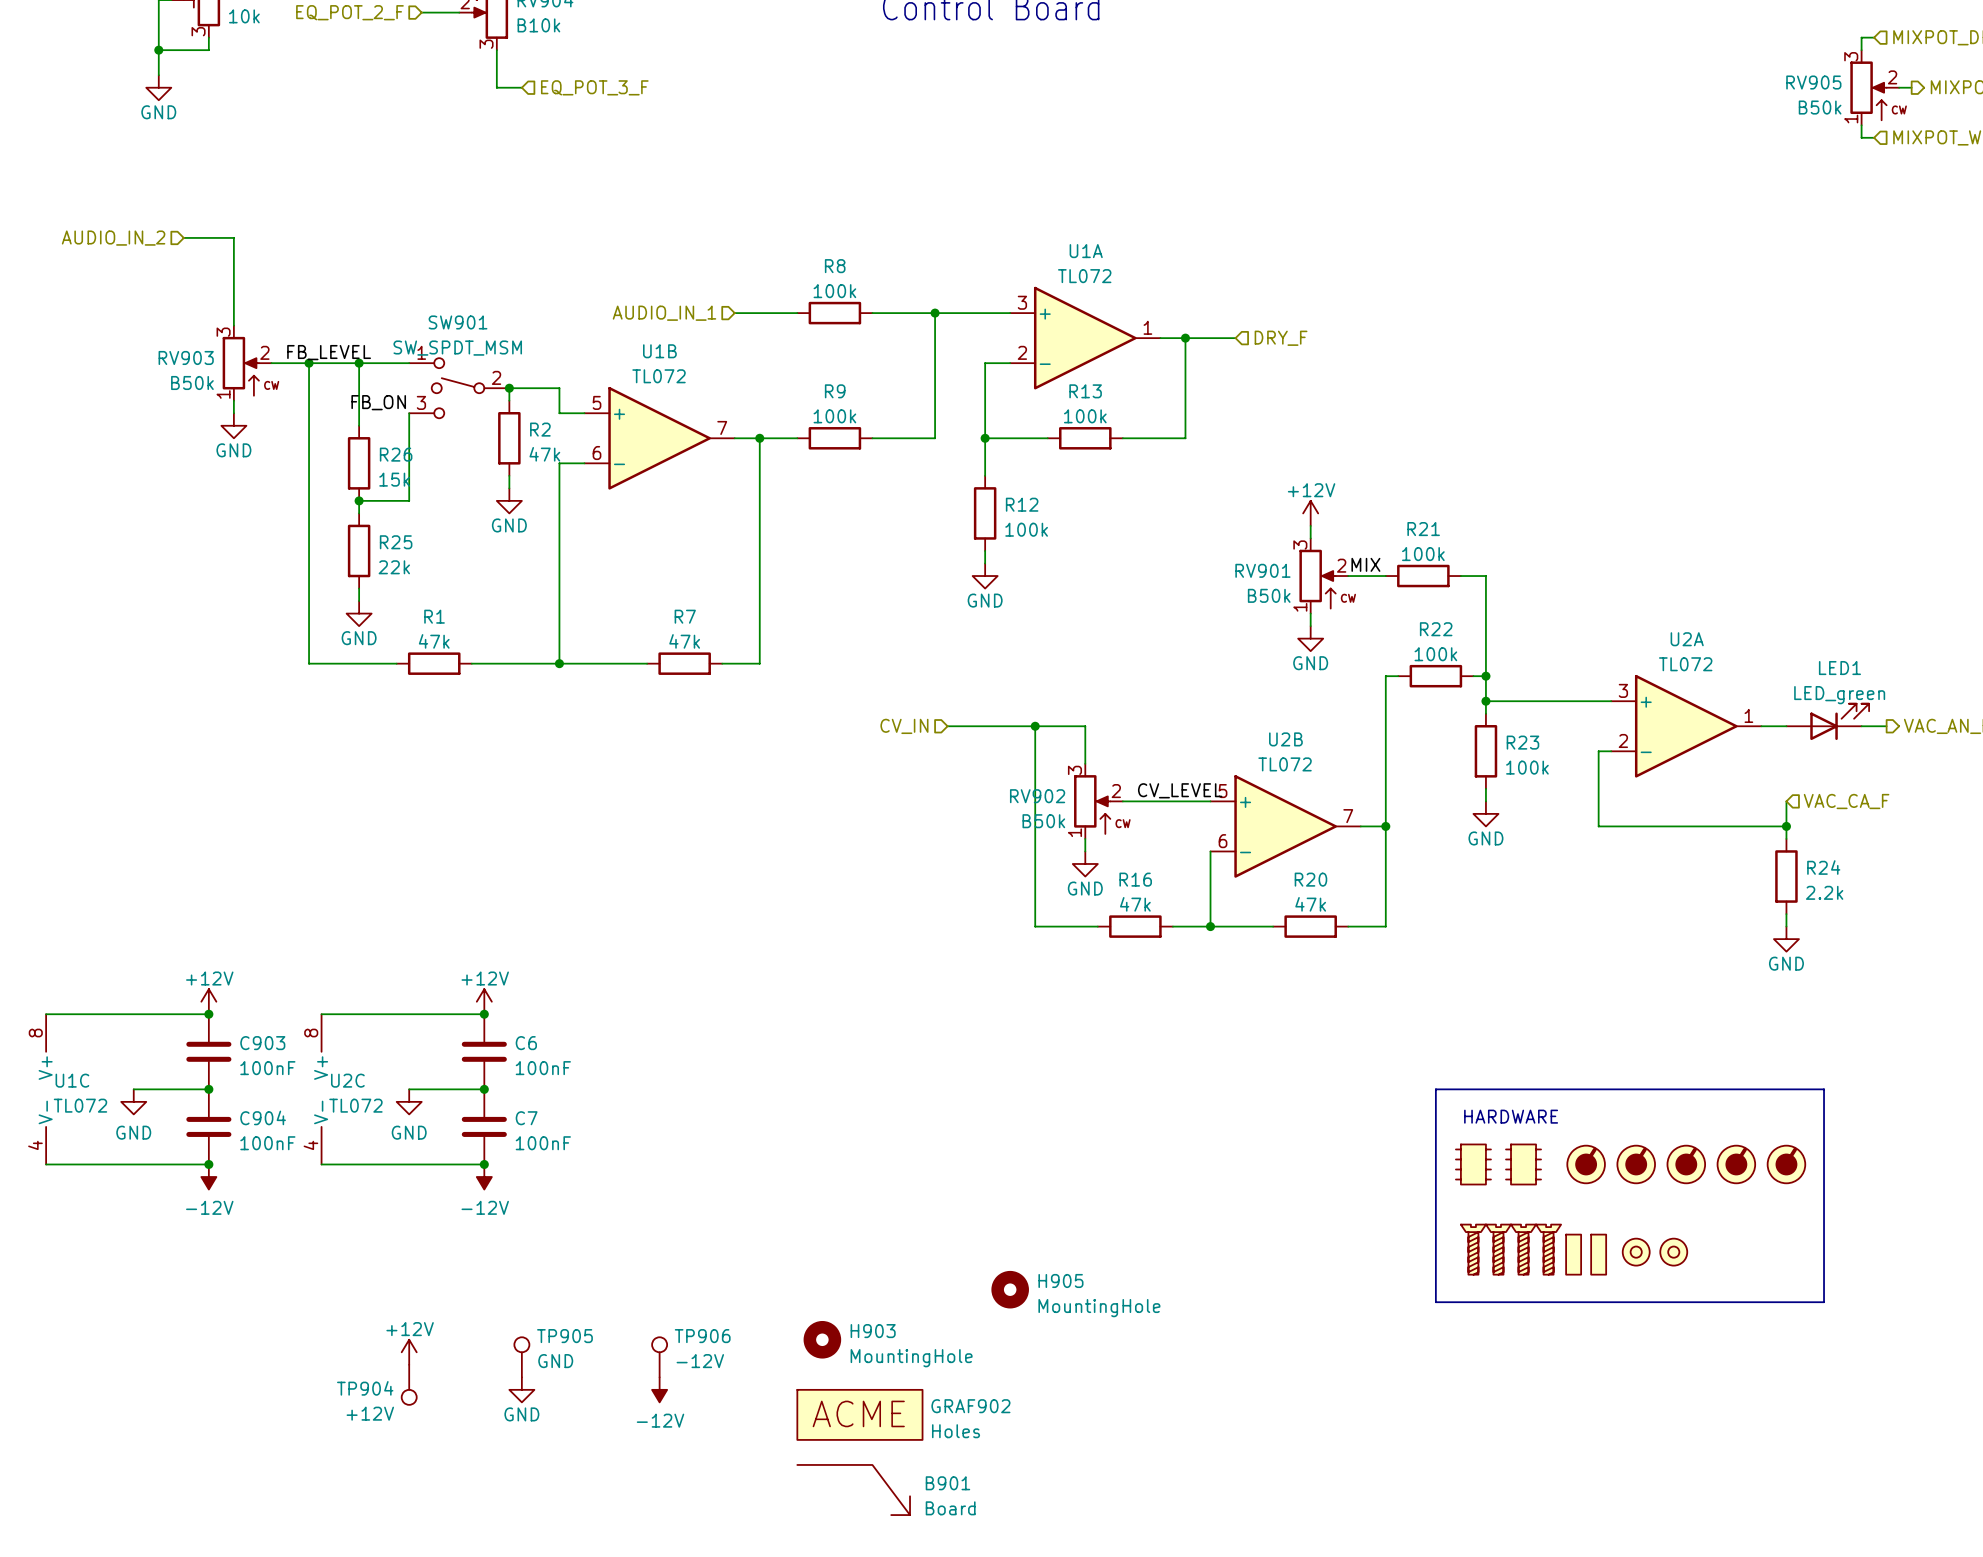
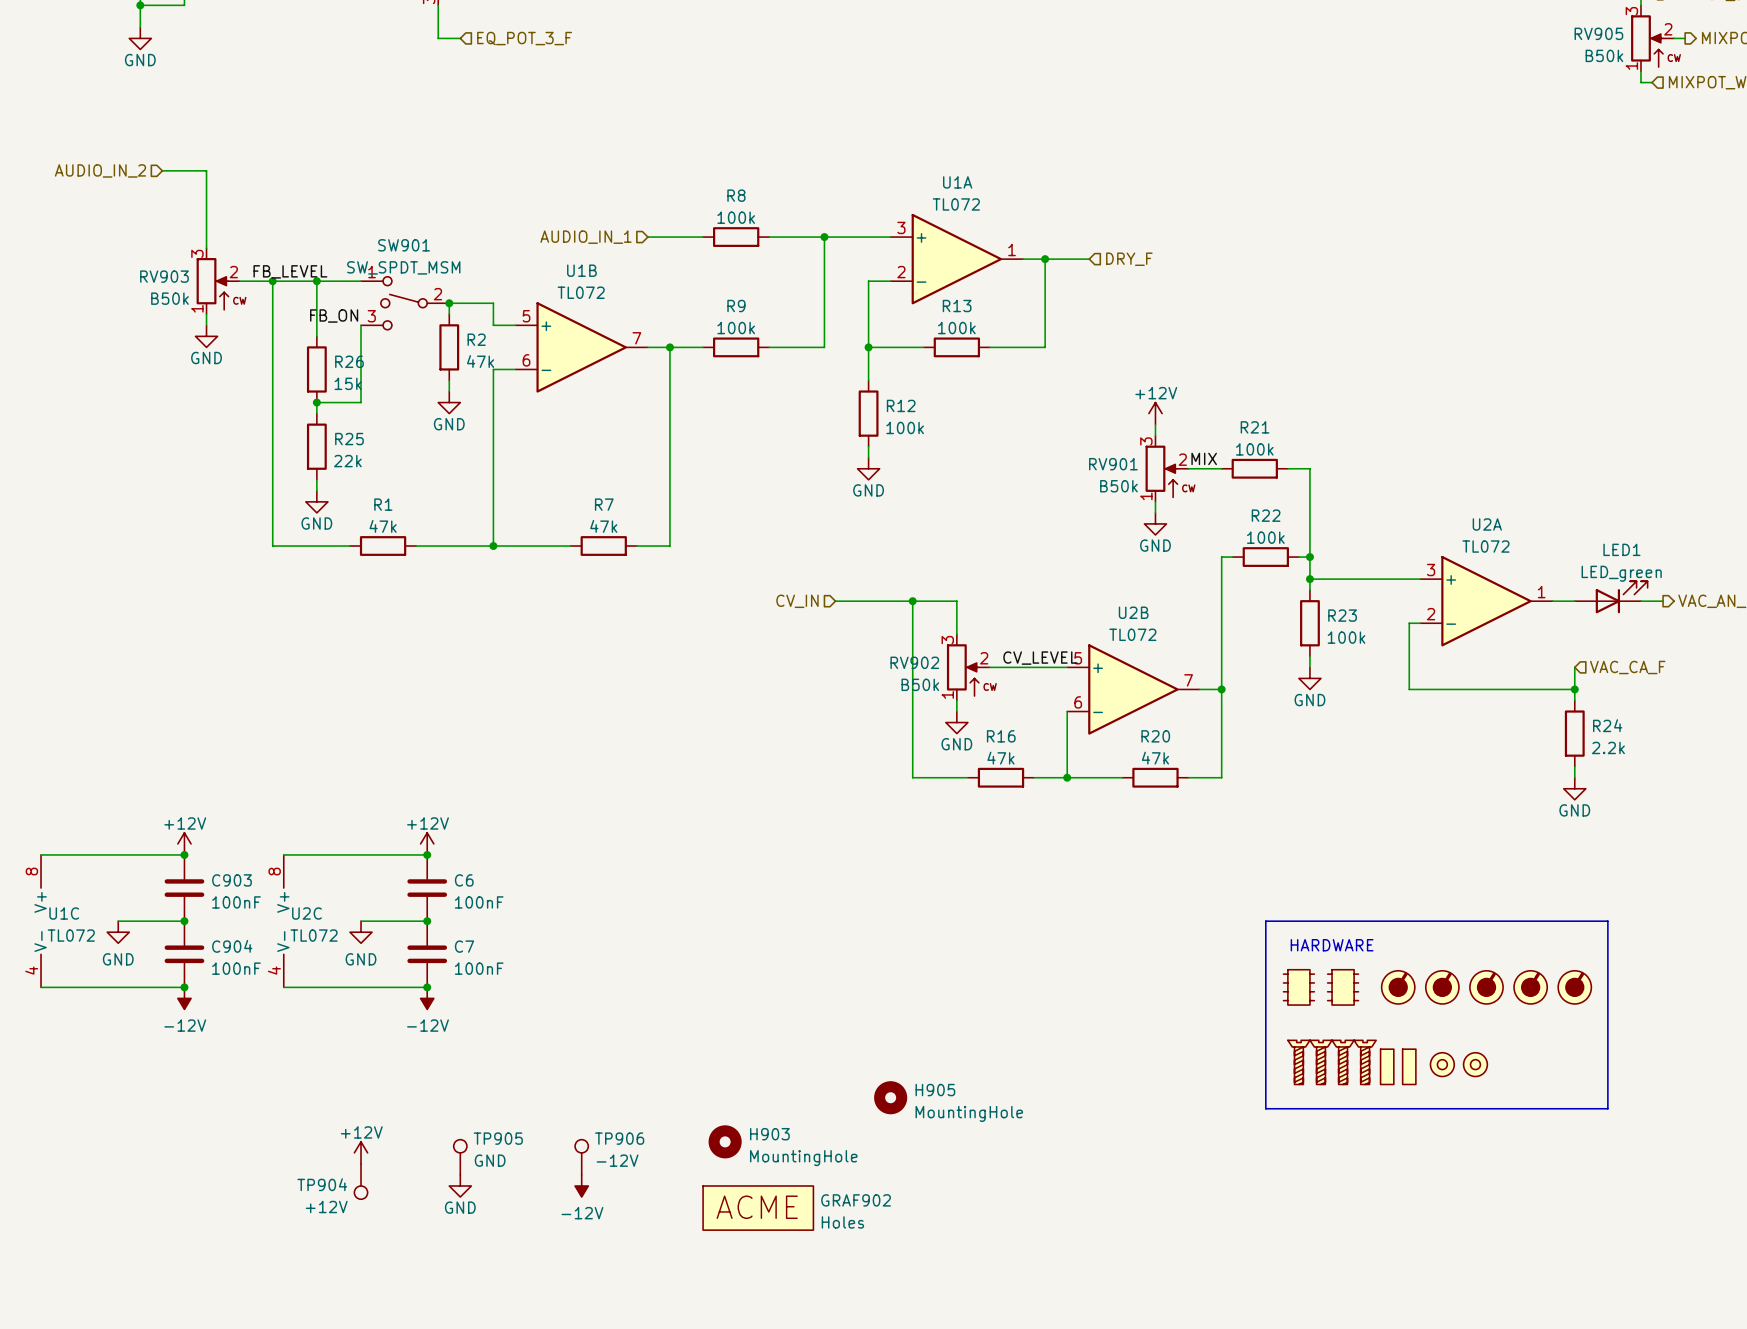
B901: Board (853, 1490) -> none

